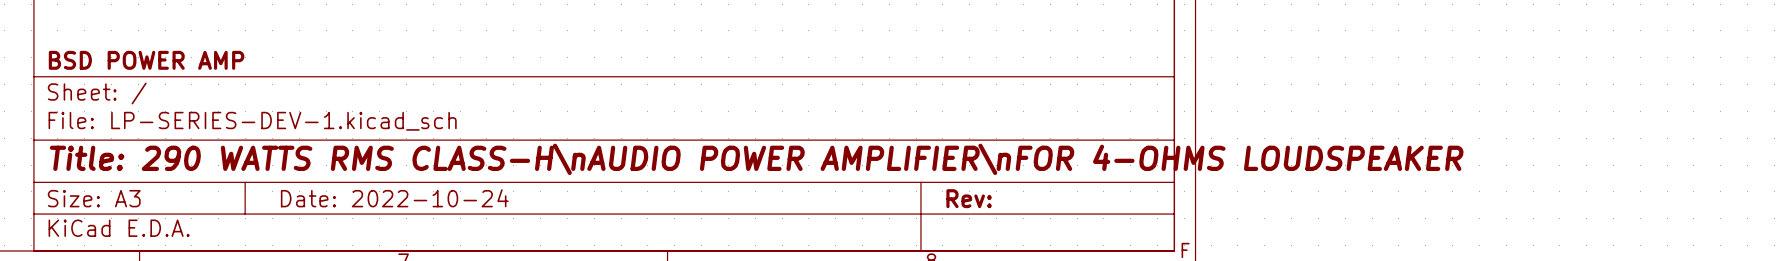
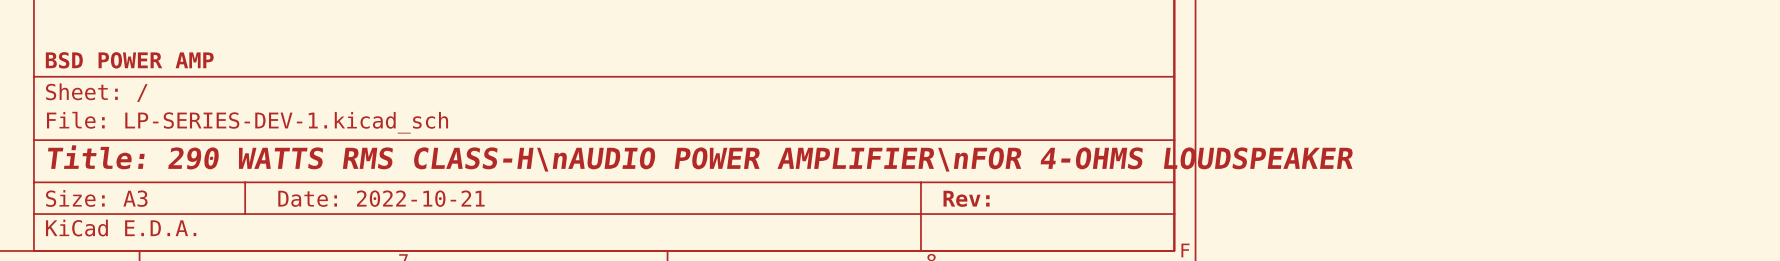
title block: Date: 2022-10-24 (394, 198) -> Date: 2022-10-21 (381, 198)

